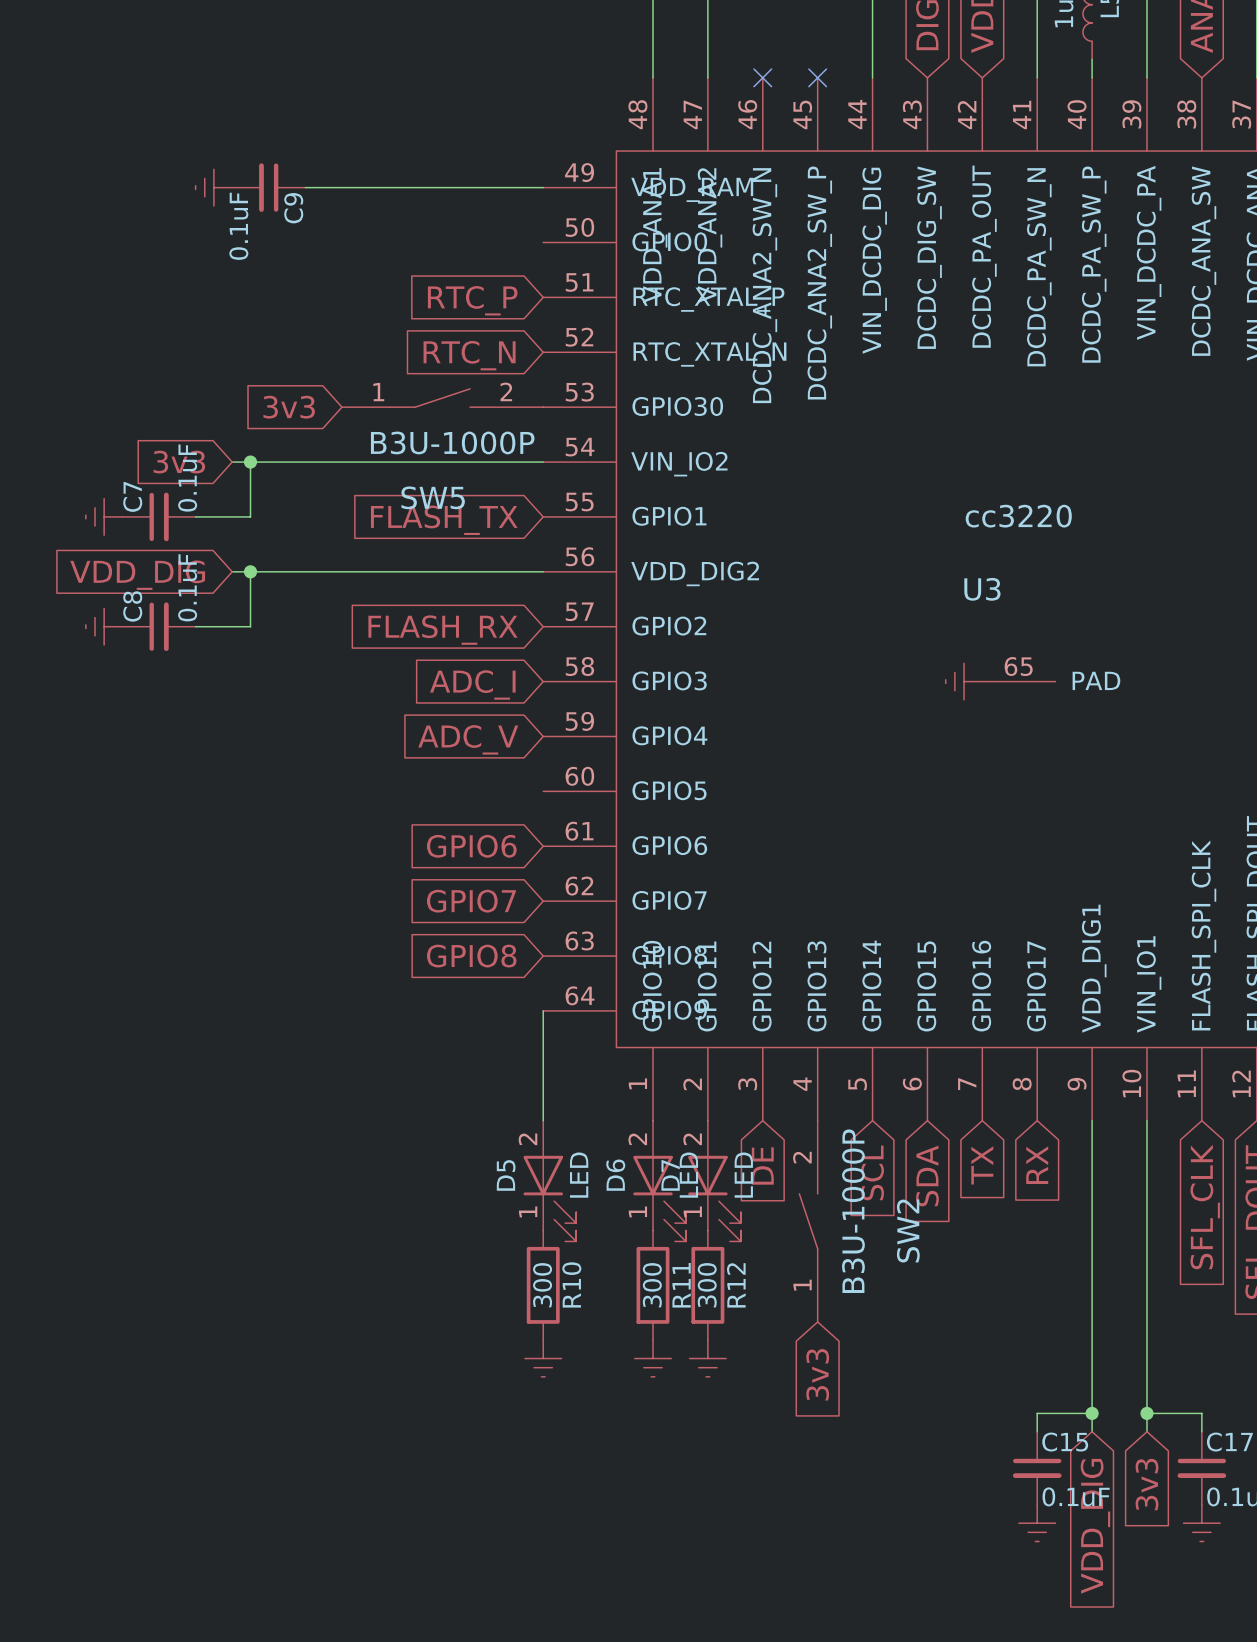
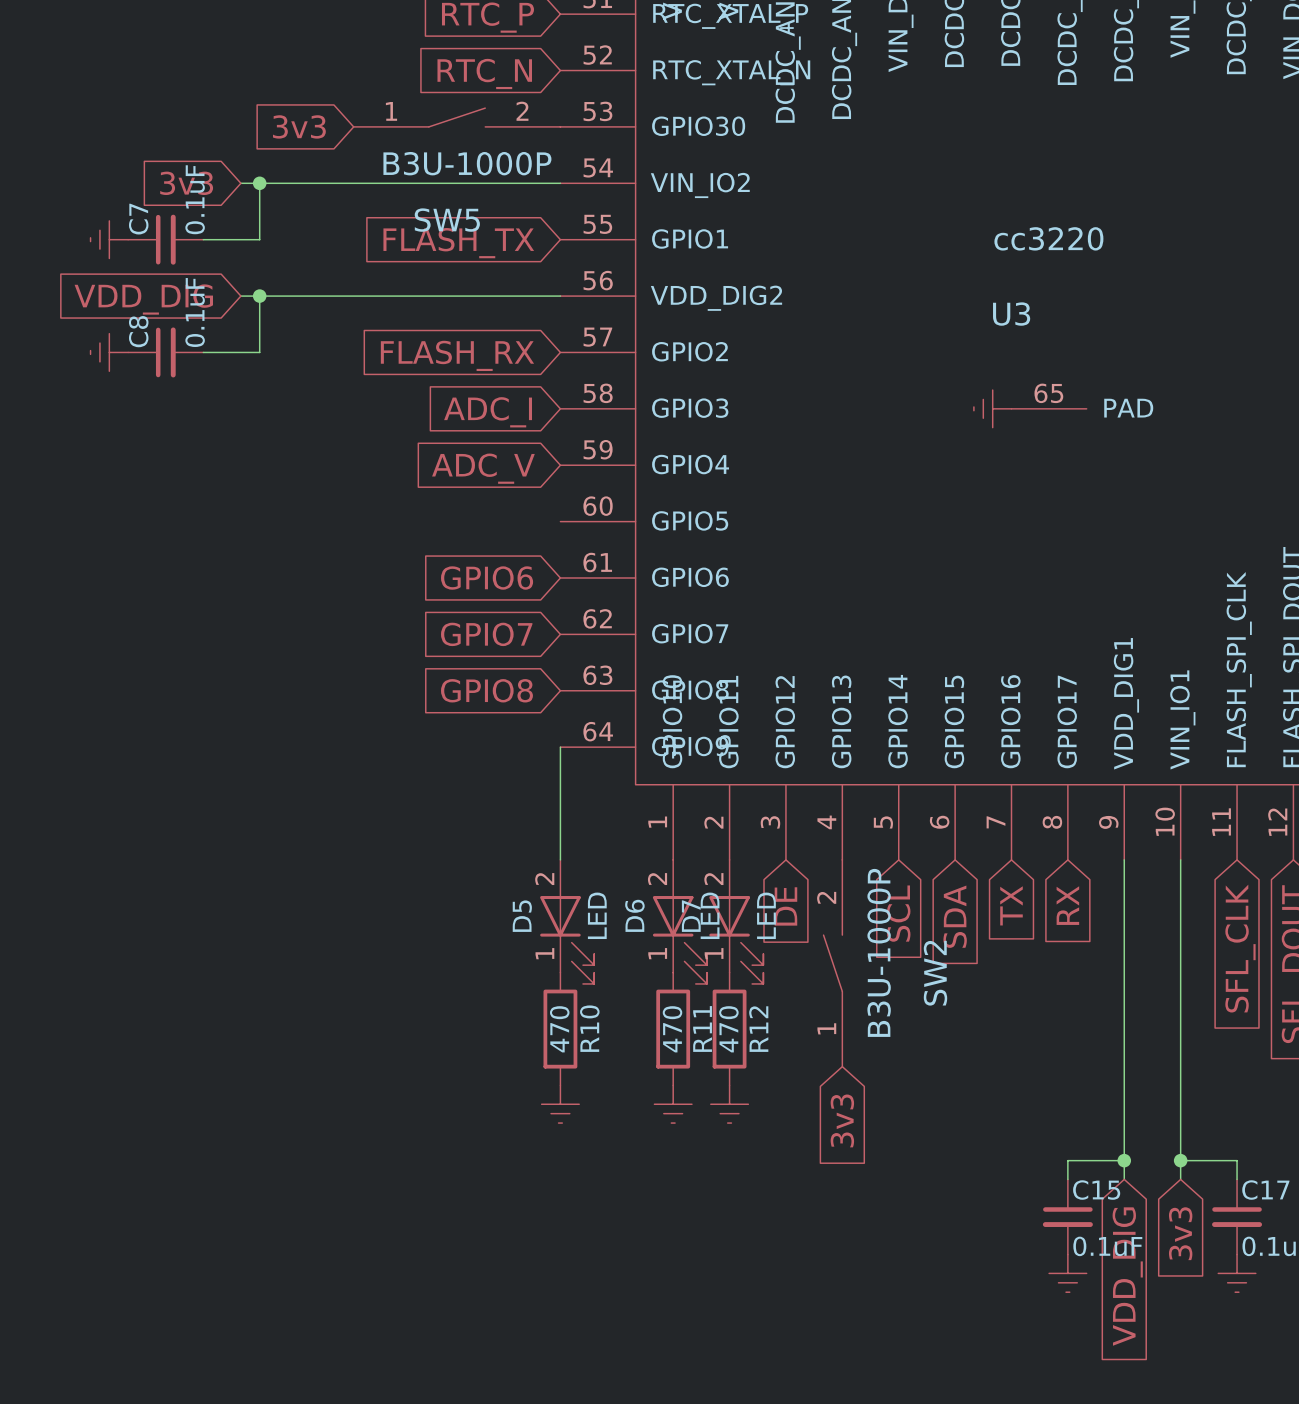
R10 value: 300 (542, 1285) -> 470 (559, 1029)
R11 value: 300 (652, 1285) -> 470 (672, 1029)
R12 value: 300 (707, 1285) -> 470 (728, 1029)

